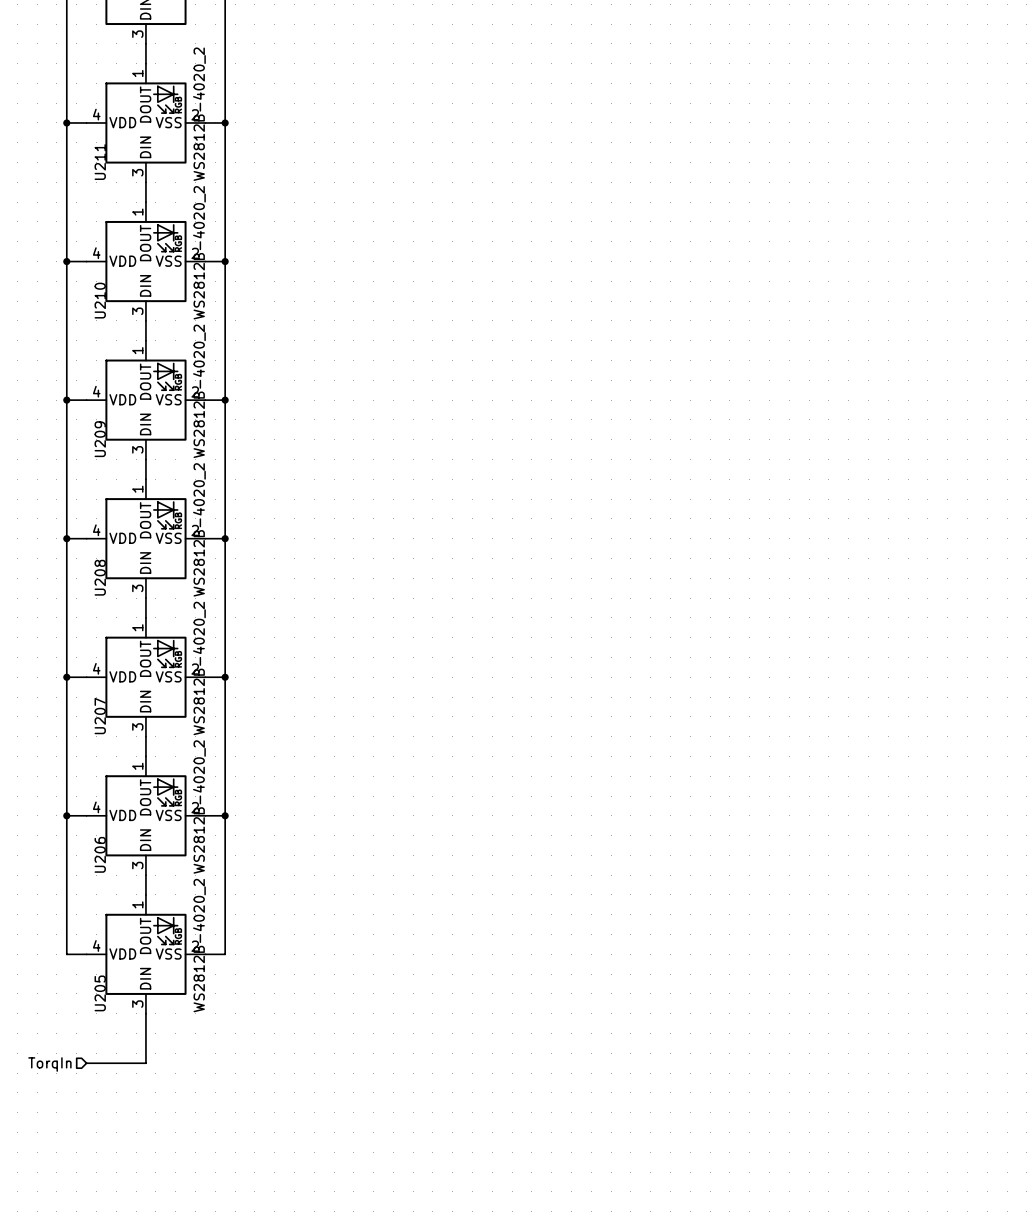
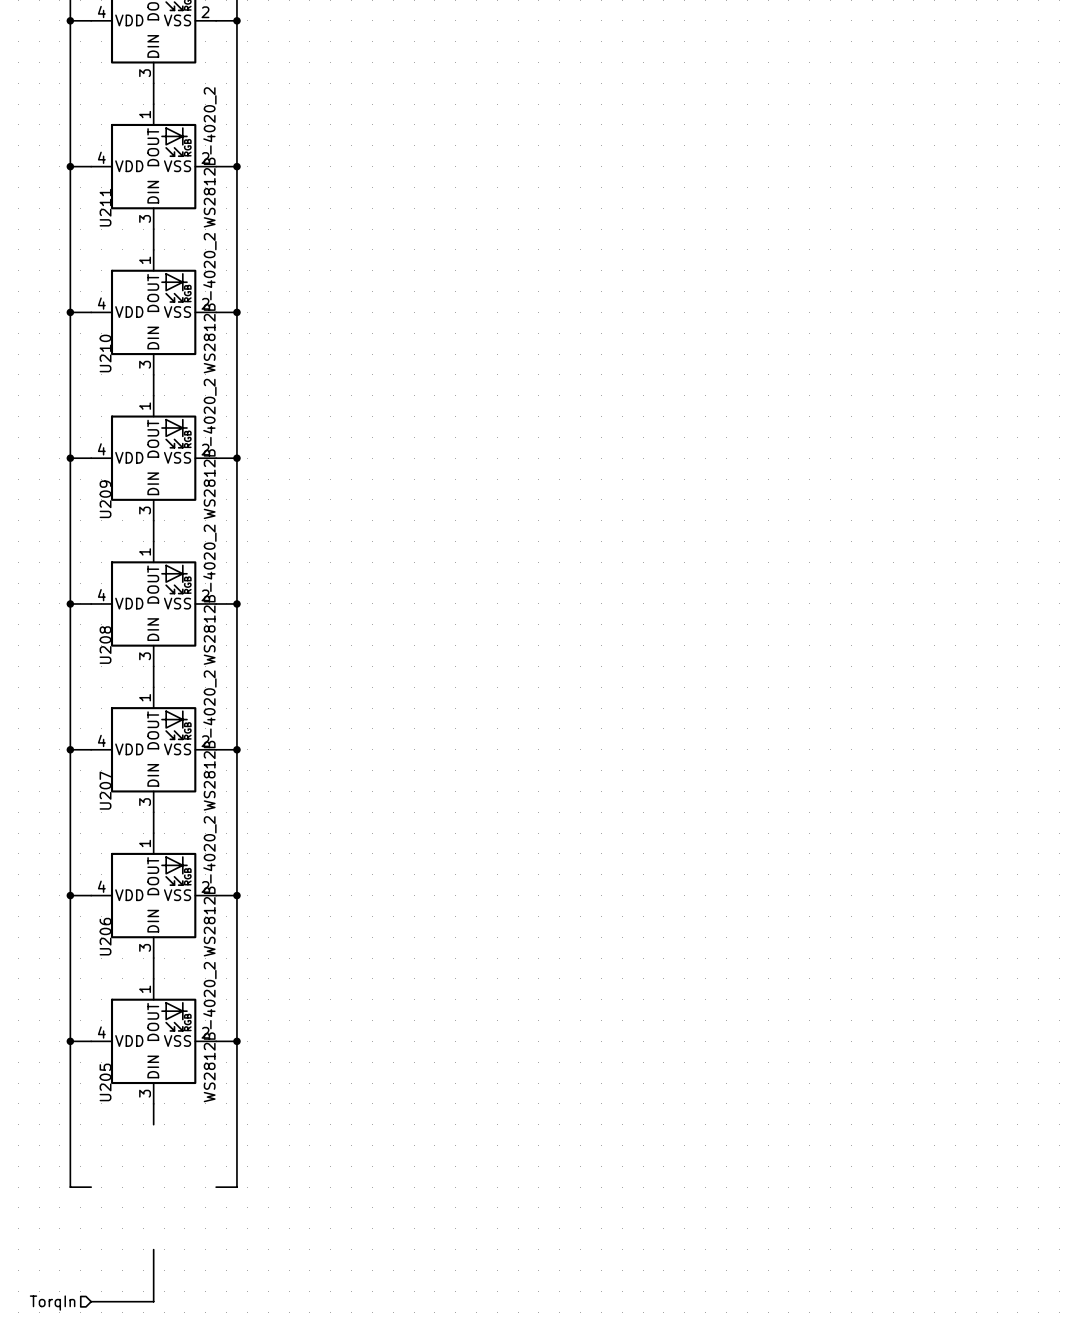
wire: none -> (70, 1041) (70, 1187) (91, 1187)
junction: none -> (70, 1041)
wire: none -> (236, 1041) (236, 1187) (216, 1187)
junction: none -> (236, 1041)
wire: (145, 1033) (145, 1063) (86, 1063) -> none
hierarchical label position: TorqIn (49, 1064) -> TorqIn (52, 1303)
wire: none -> (153, 1249) (153, 1301) (91, 1301)

